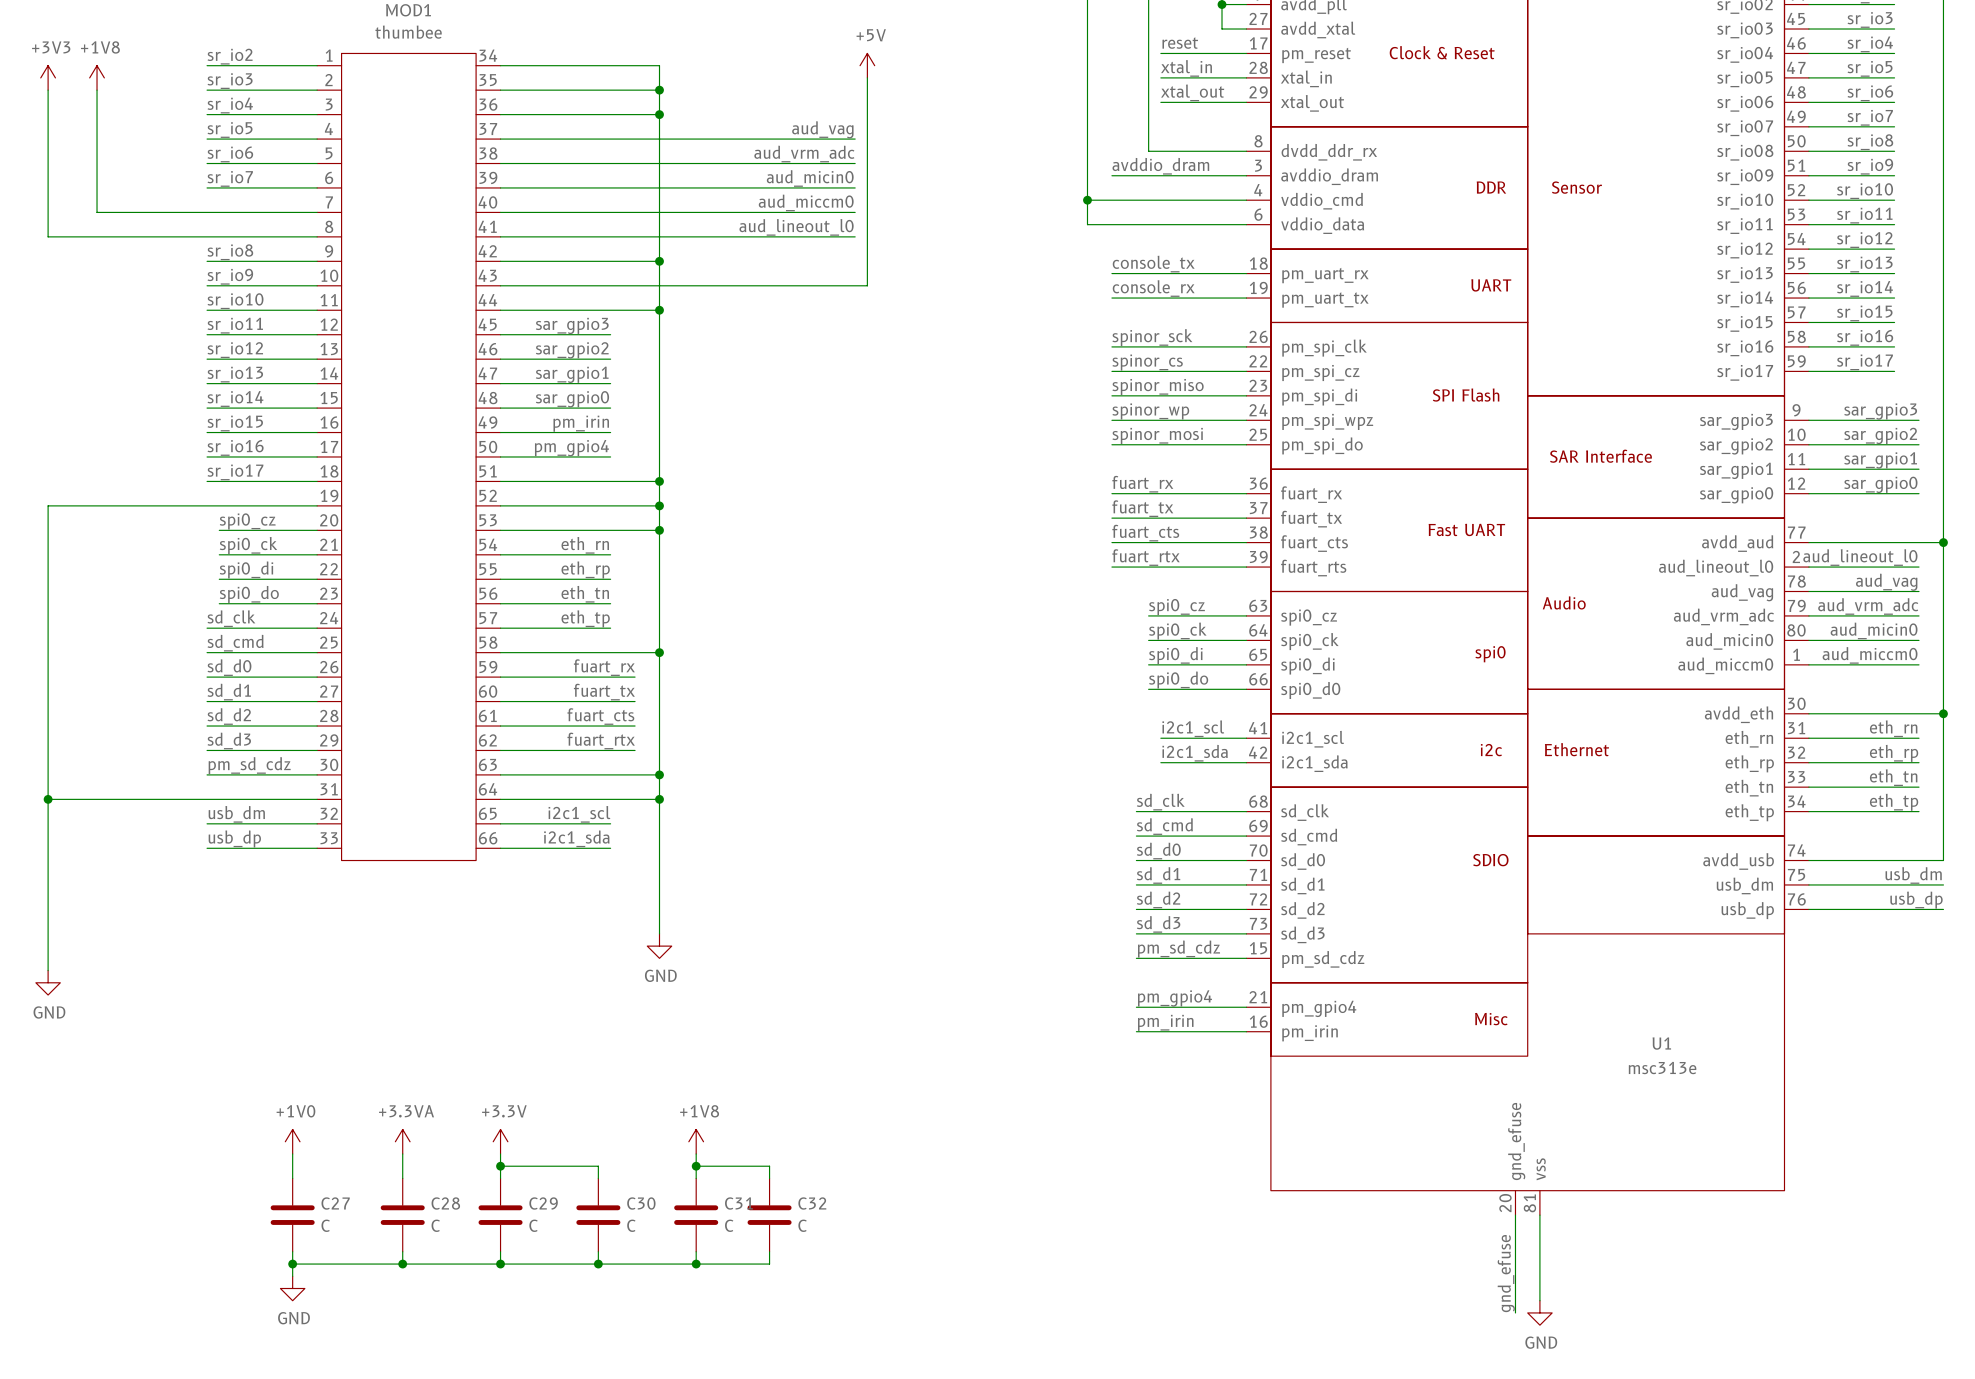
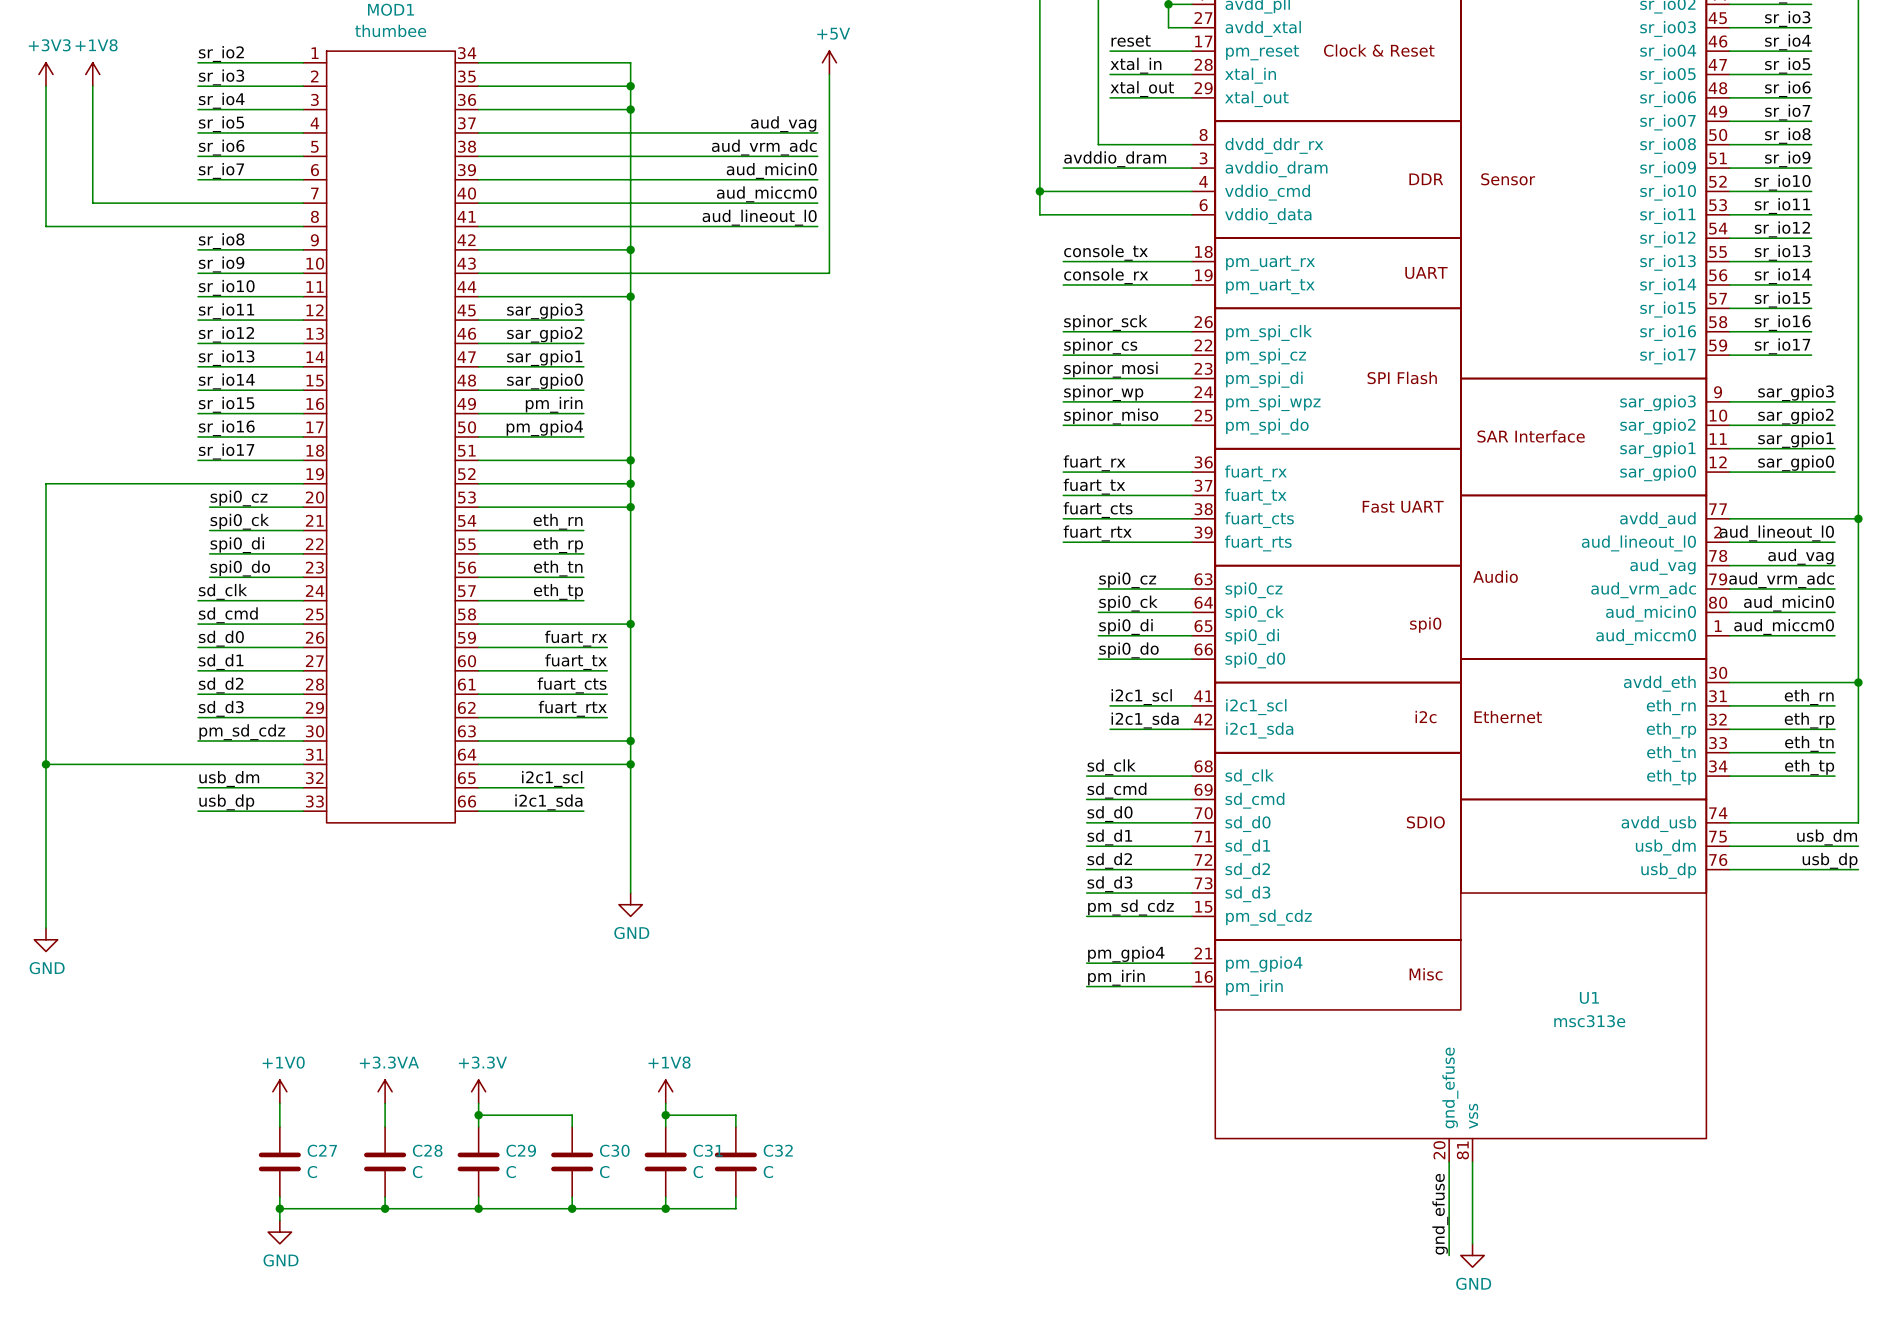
label: spinor_miso (1158, 387) -> spinor_mosi (1110, 369)
label: spinor_mosi (1157, 435) -> spinor_miso (1111, 416)

